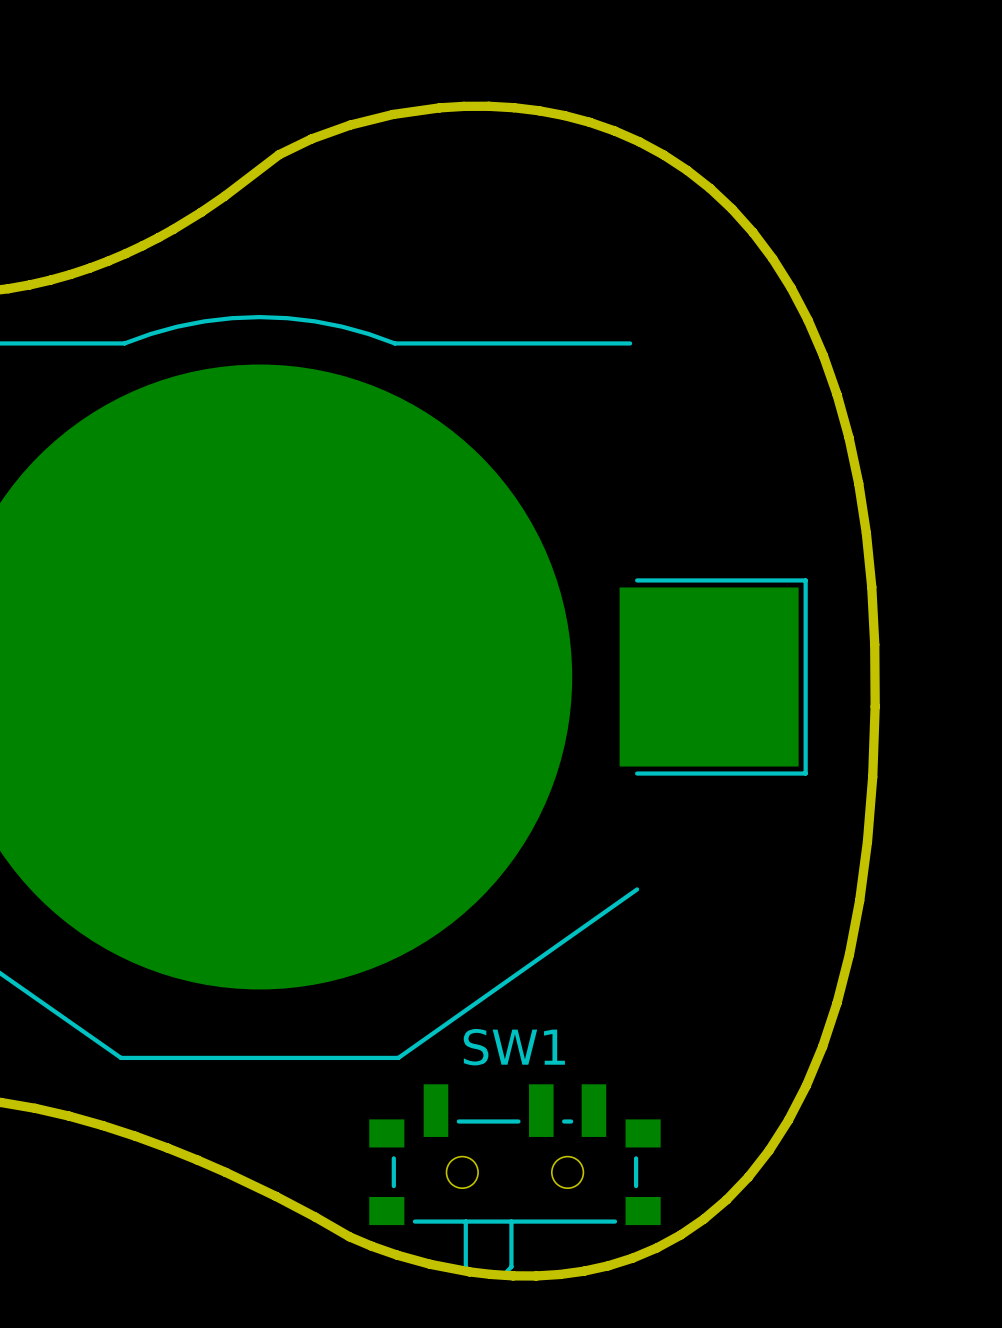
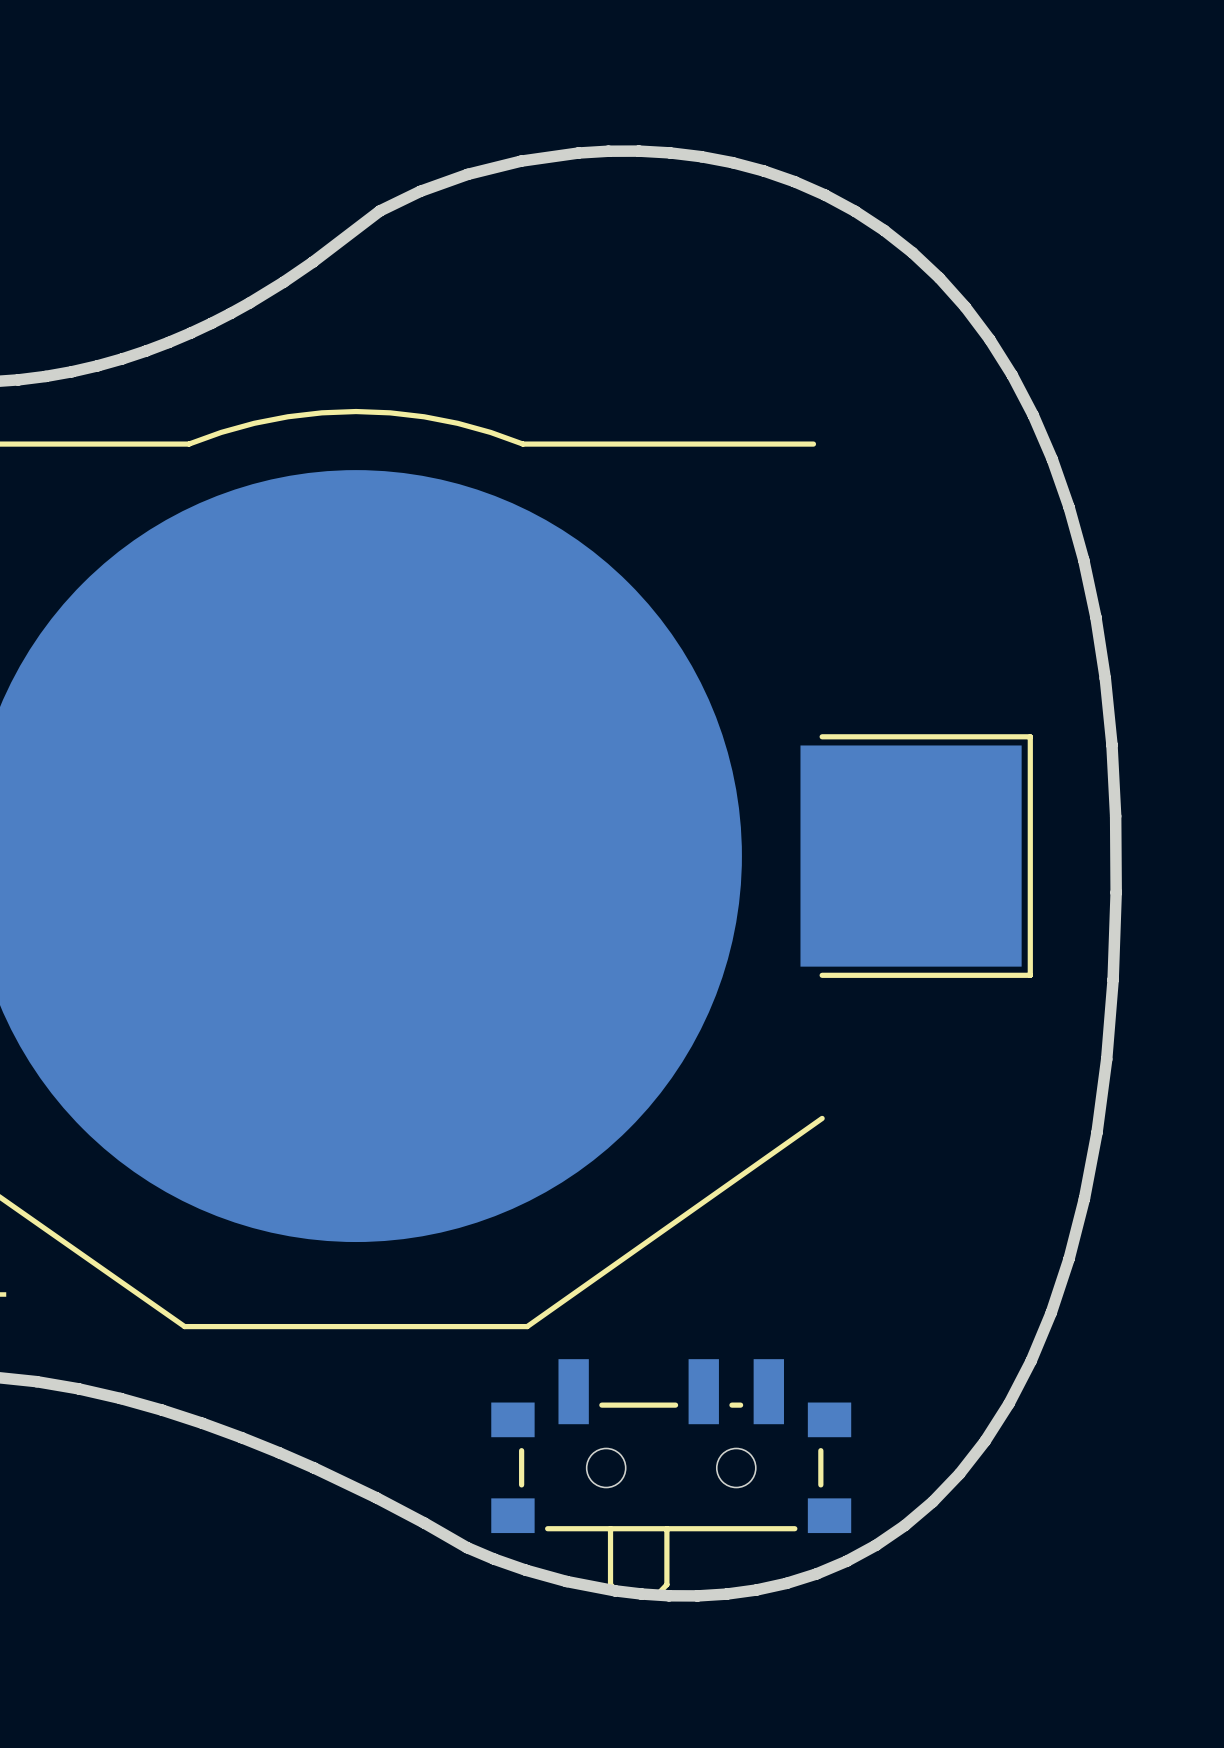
SW1 name: SW1 (514, 1047) -> none

